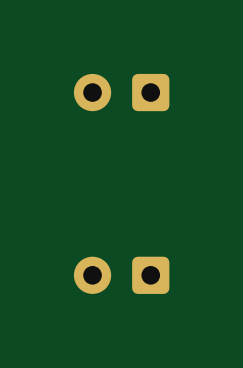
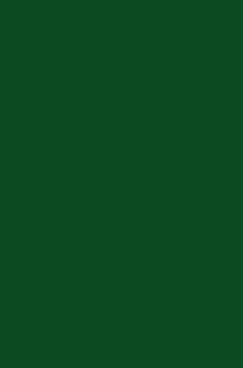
part: (121, 92) -> none
part: (121, 275) -> none

